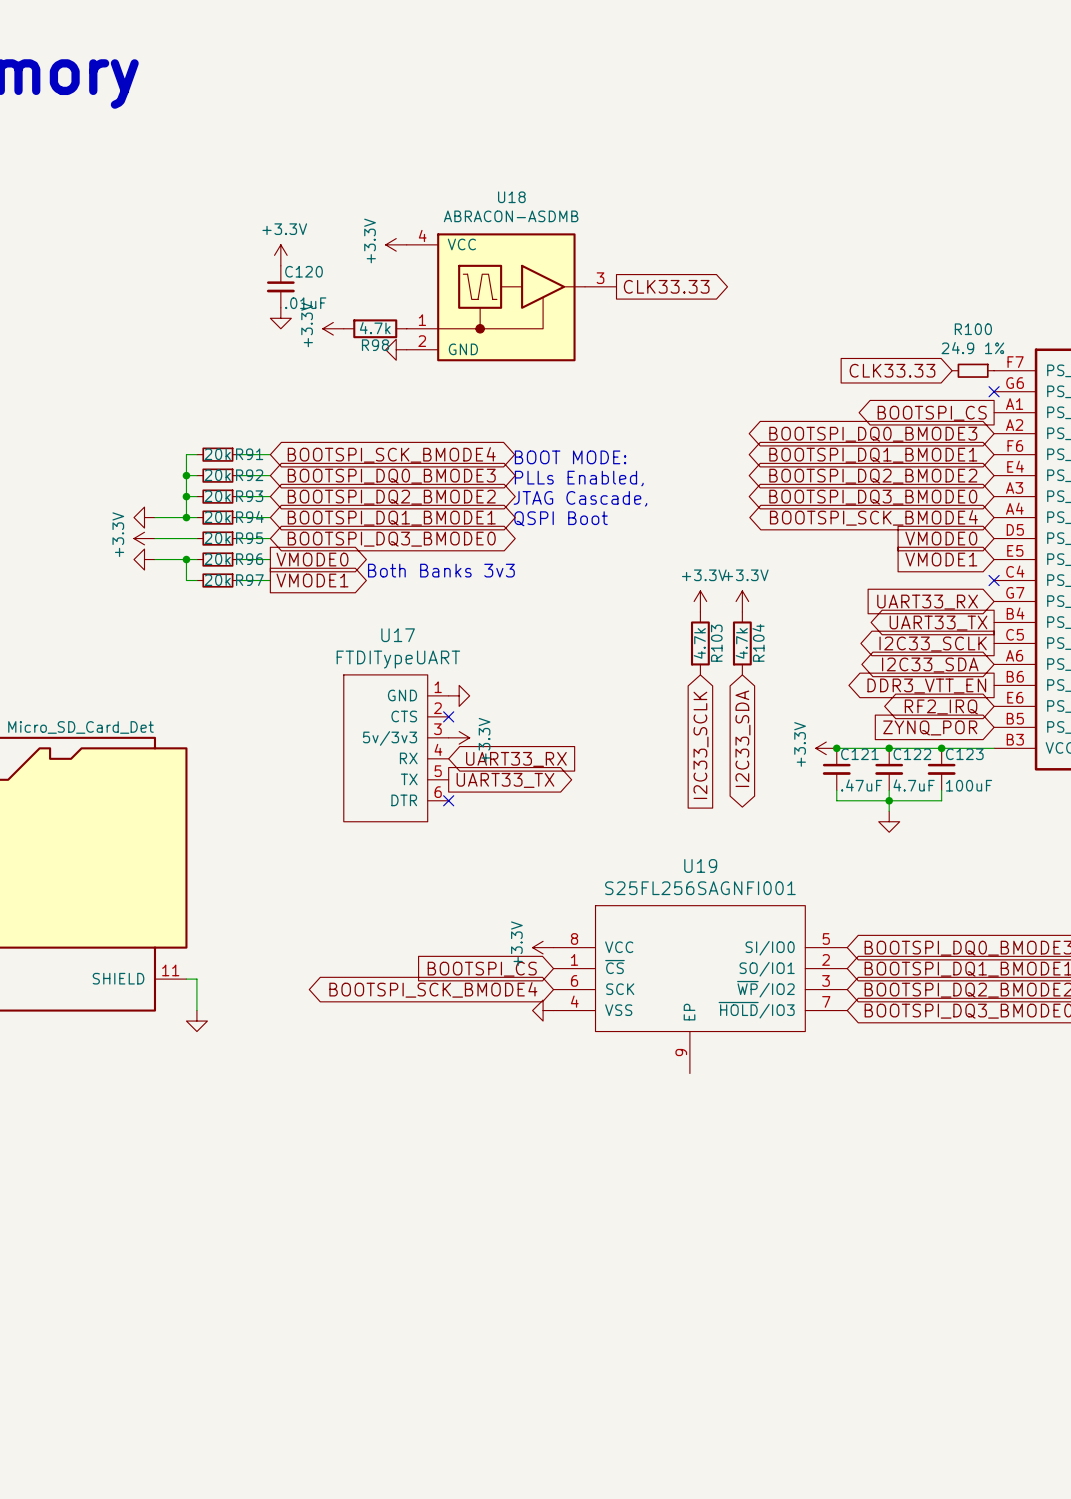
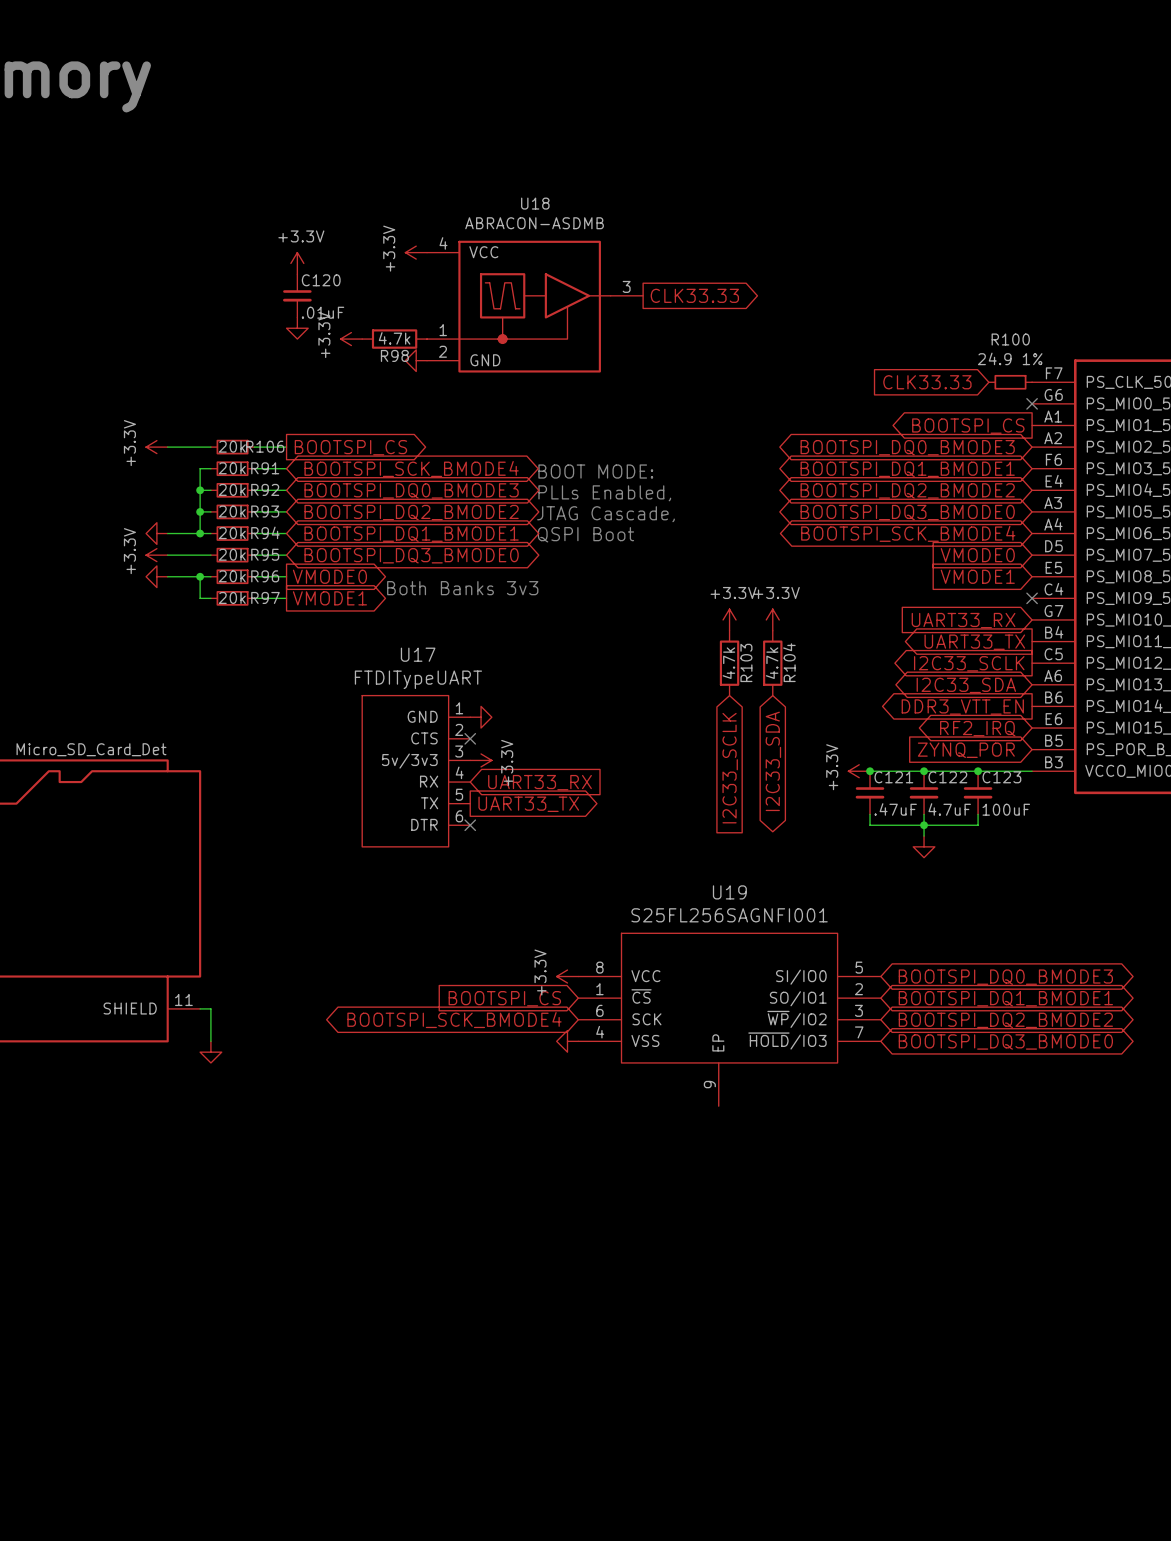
power symbol: none -> +3.3V (156, 447)
wire: none -> (167, 447) (210, 447)
R106: none -> 20k (232, 447)
wire: none -> (254, 447) (286, 447)
global label: none -> BOOTSPI_CS (350, 447)

